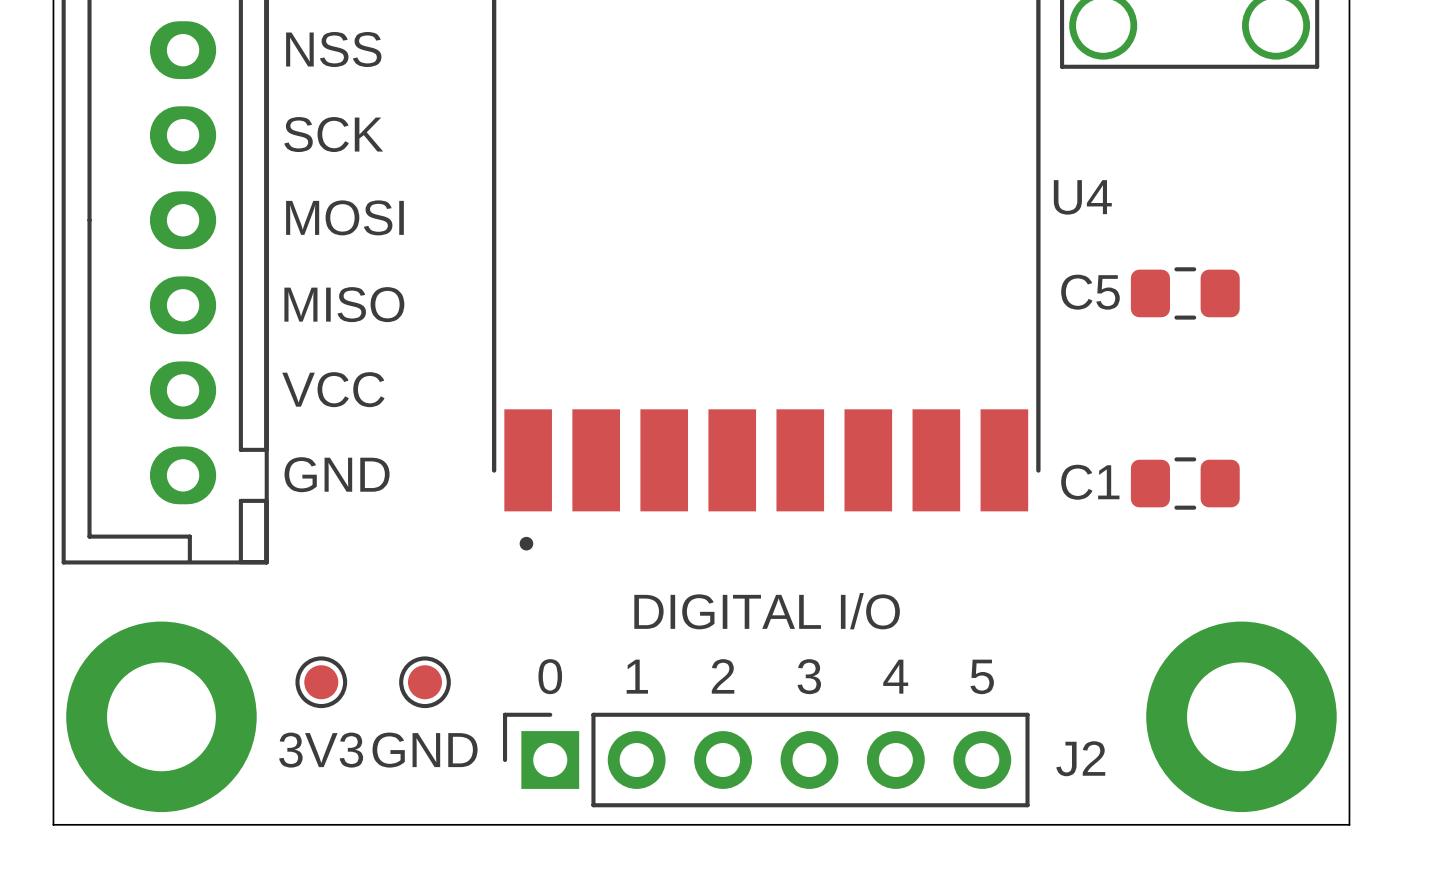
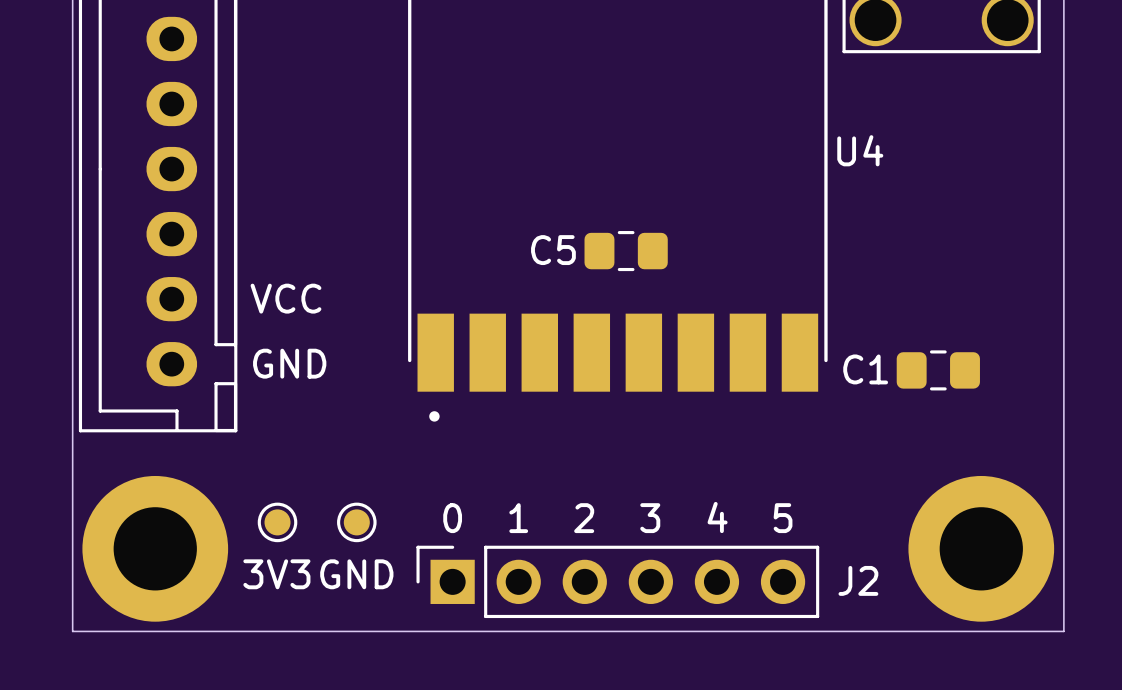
text: NSS (333, 49) -> none
text: SCK (333, 134) -> none
text: MOSI (344, 217) -> none
C5 position: (1185, 293) -> (626, 251)
text: MISO (344, 304) -> none
text: DIGITAL I/O (767, 611) -> none

